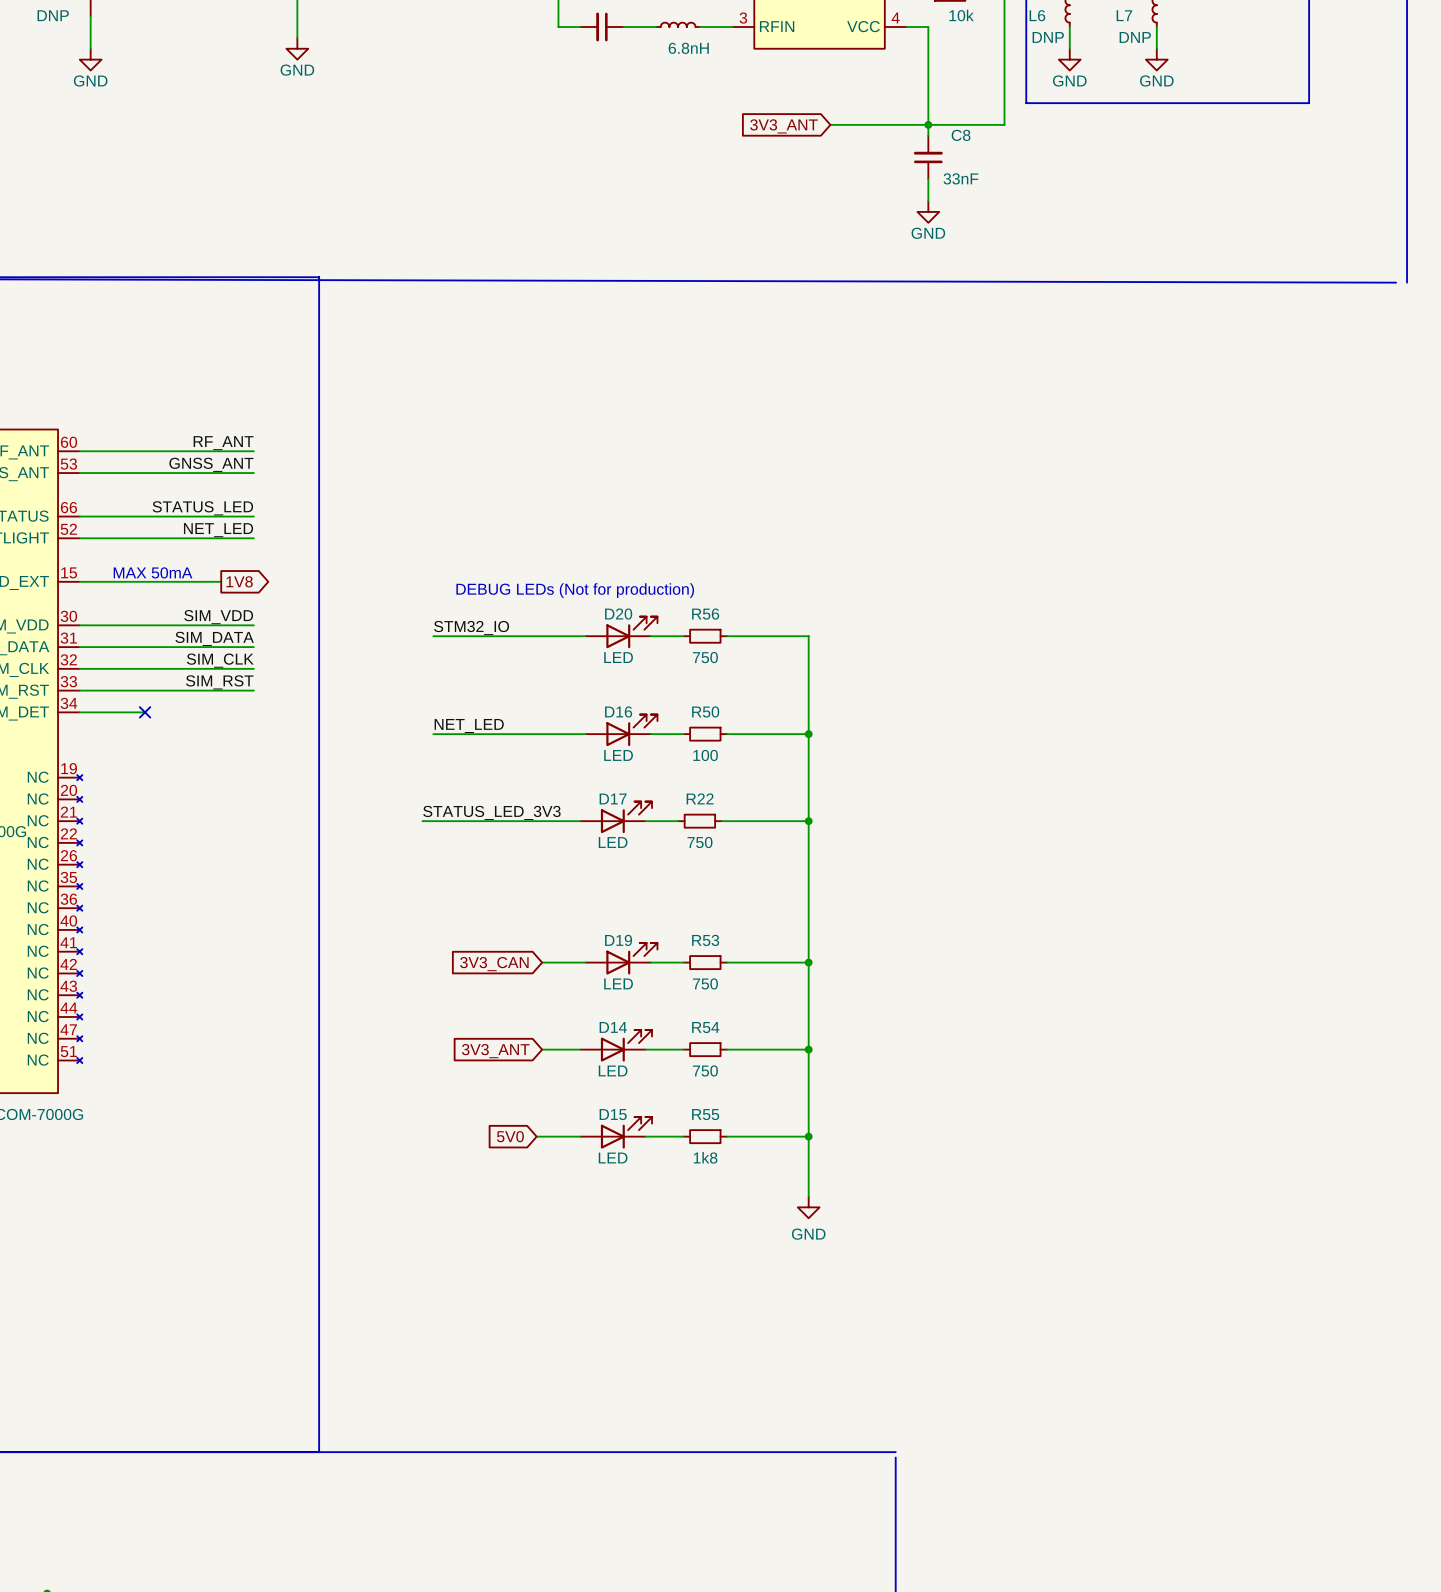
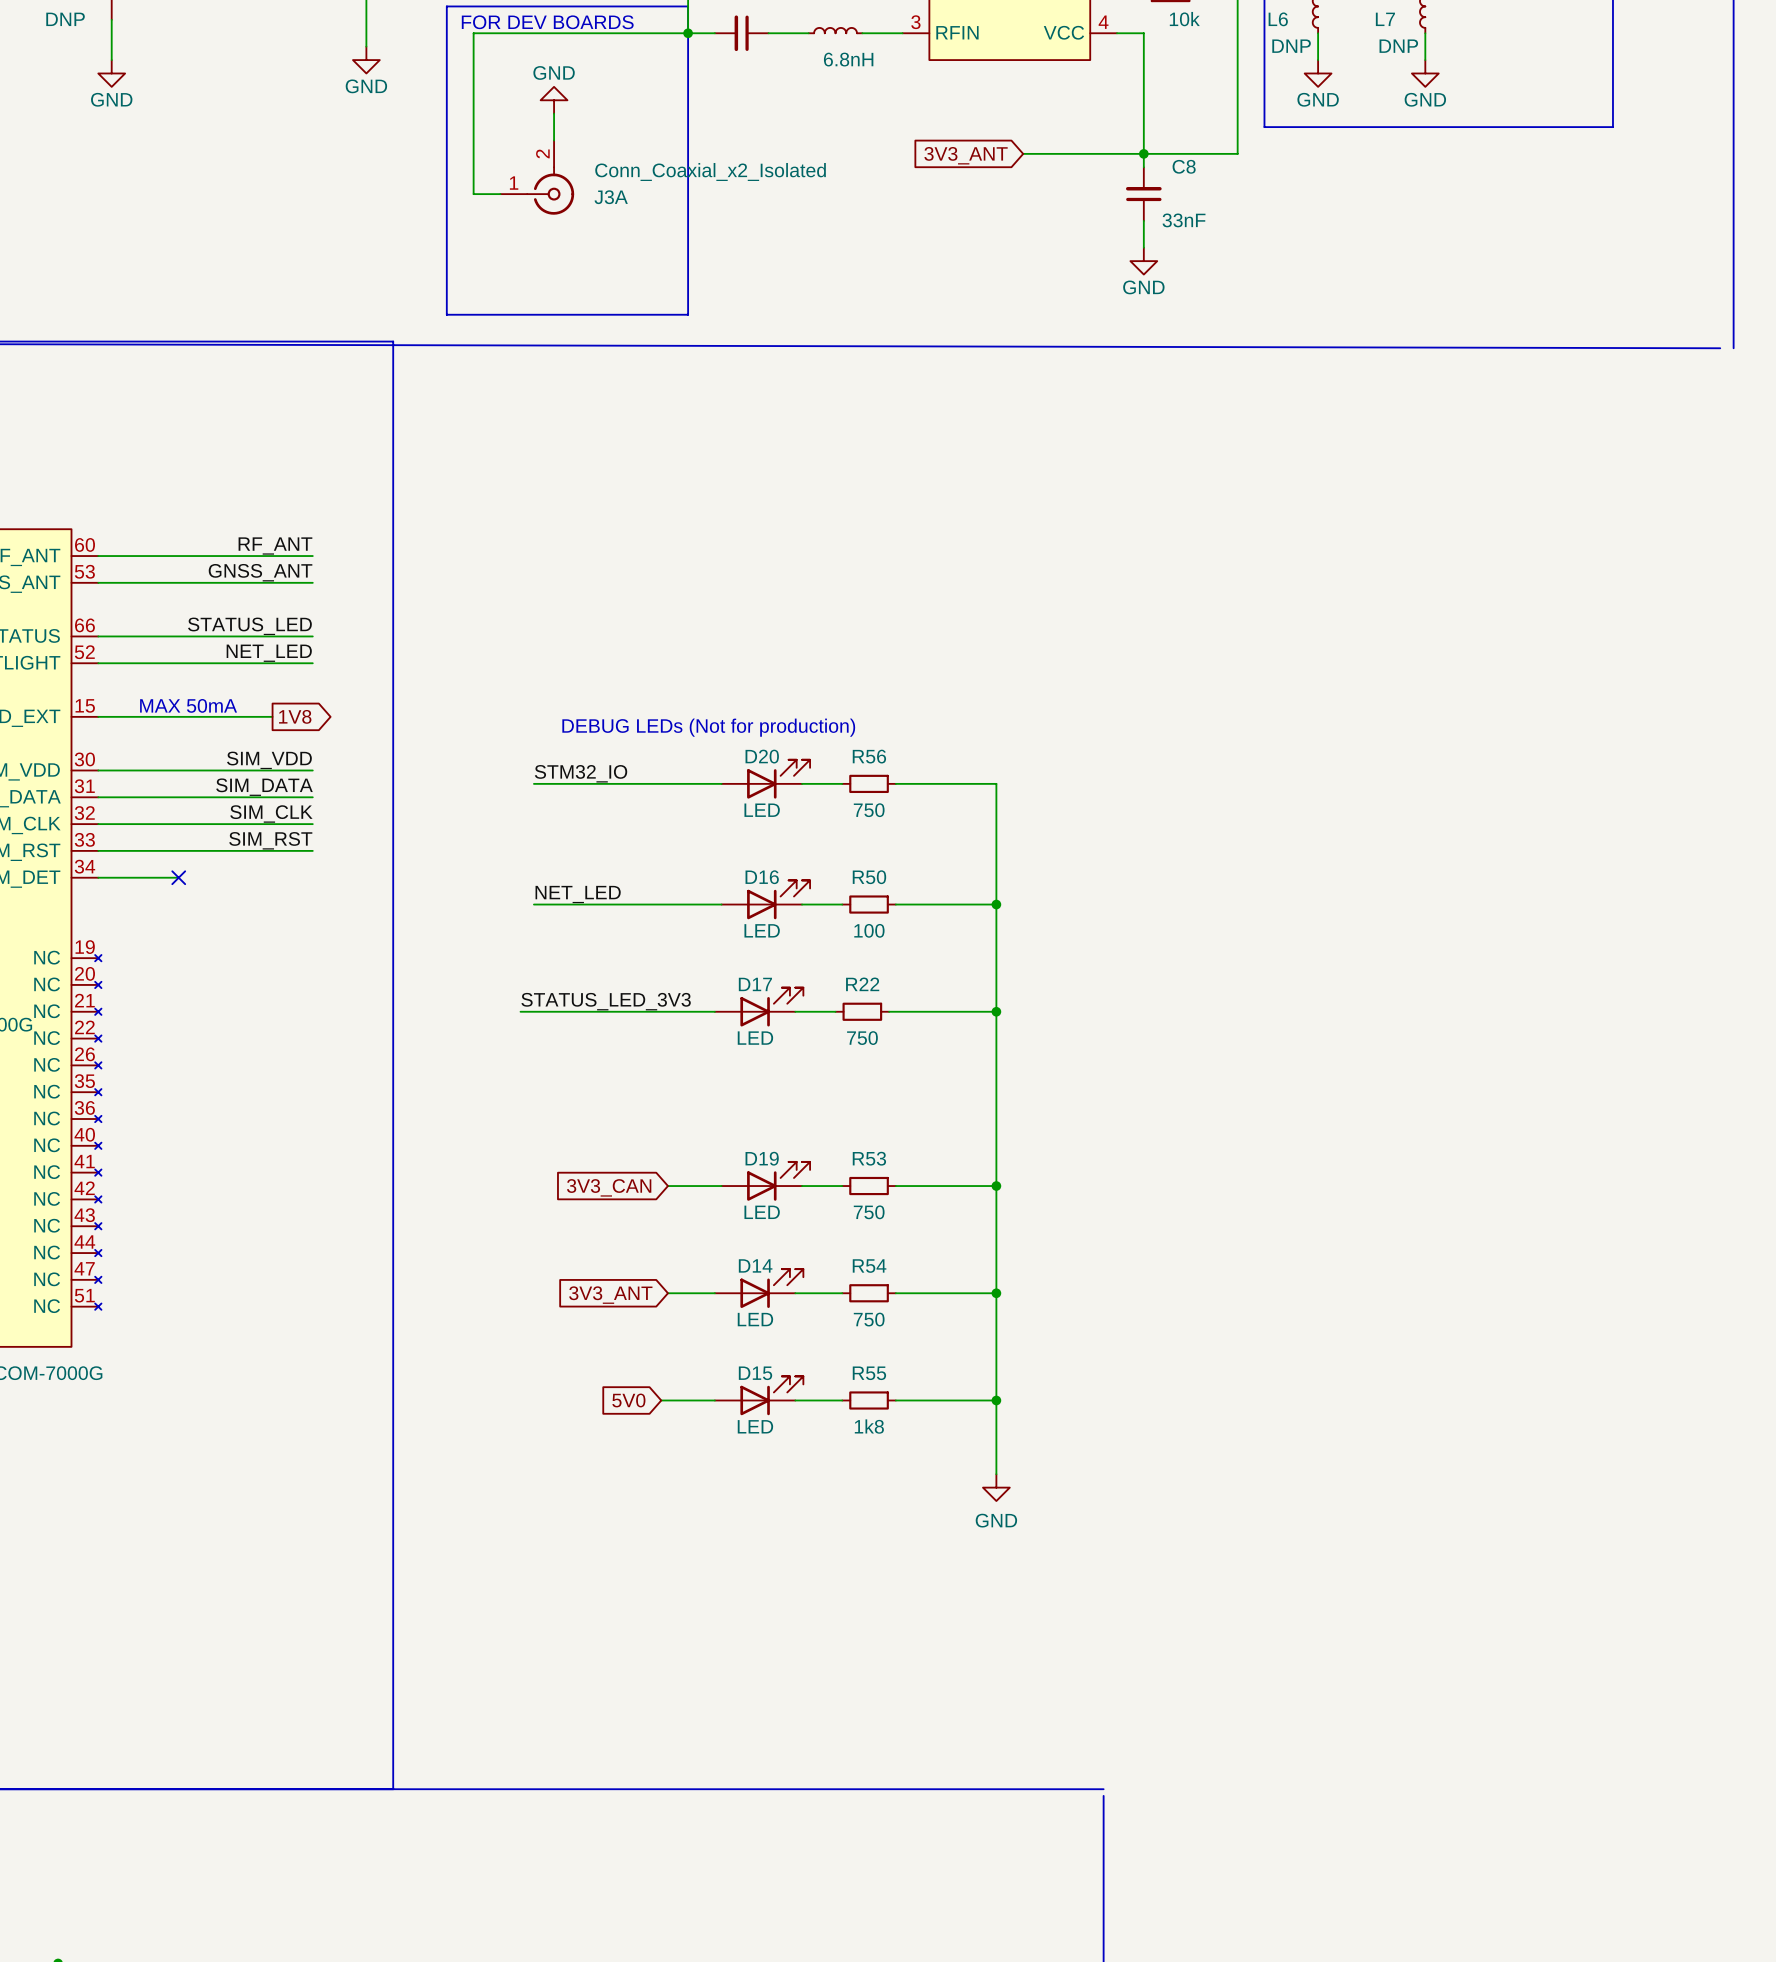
line: none -> (446, 6) (688, 6) (688, 314) (446, 314) (446, 6)
text: none -> FOR DEV BOARDS (547, 22)
wire: none -> (688, 33) (473, 33) (473, 194) (500, 194)
junction: none -> (688, 33)
power symbol: none -> GND (554, 100)
wire: none -> (554, 113) (554, 140)
J3A: none -> Conn_Coaxial_x2_Isolated (537, 177)

